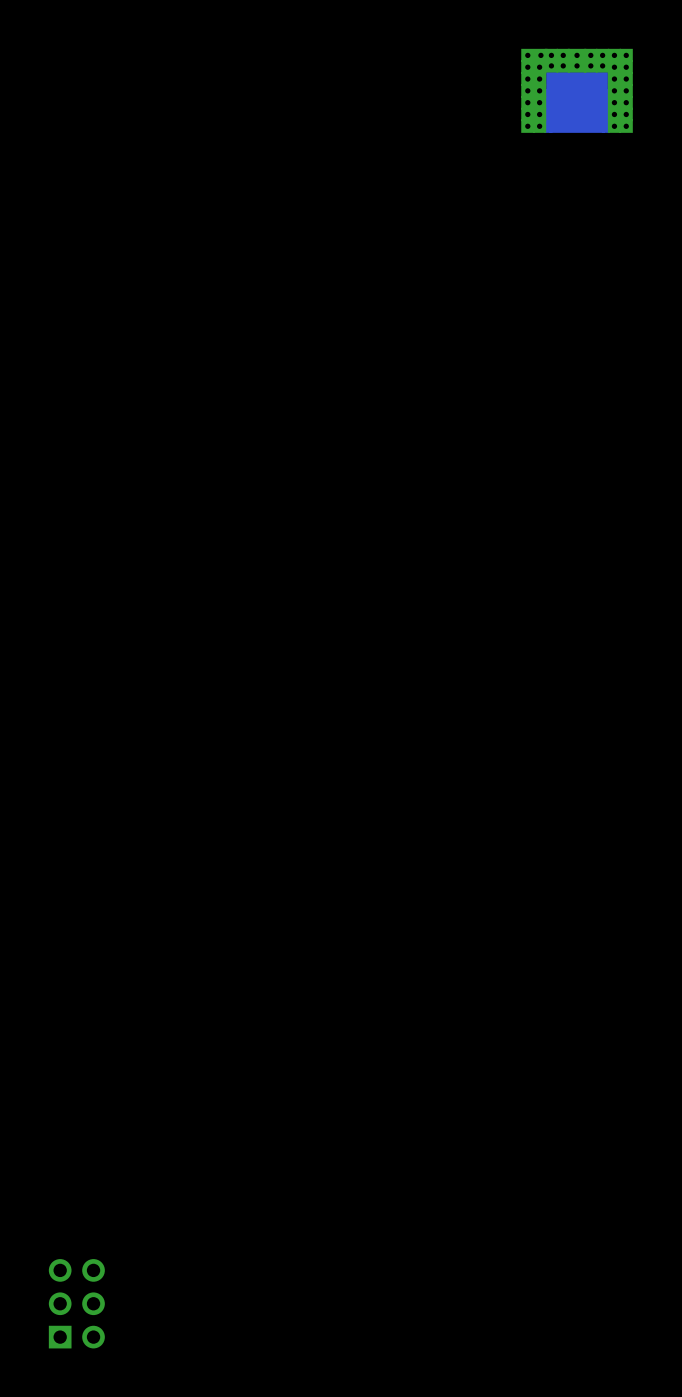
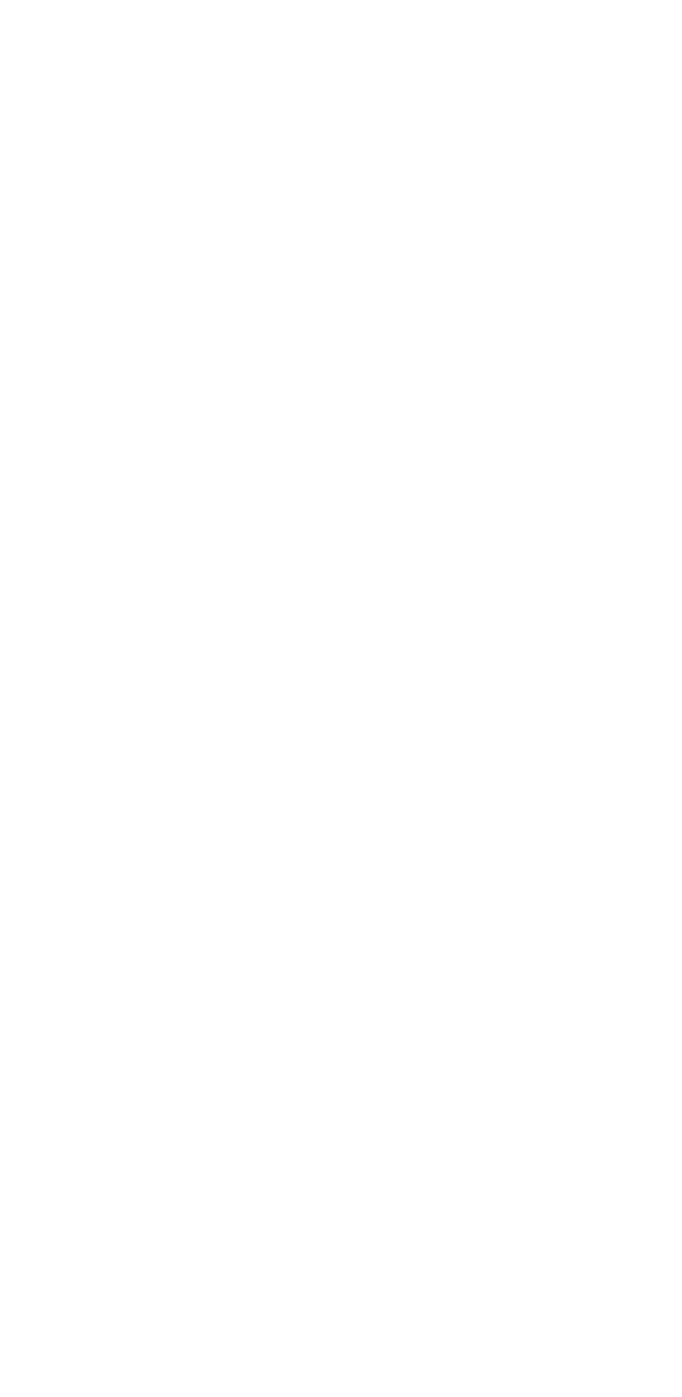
part: (577, 90) -> none
part: (76, 1303) -> none

